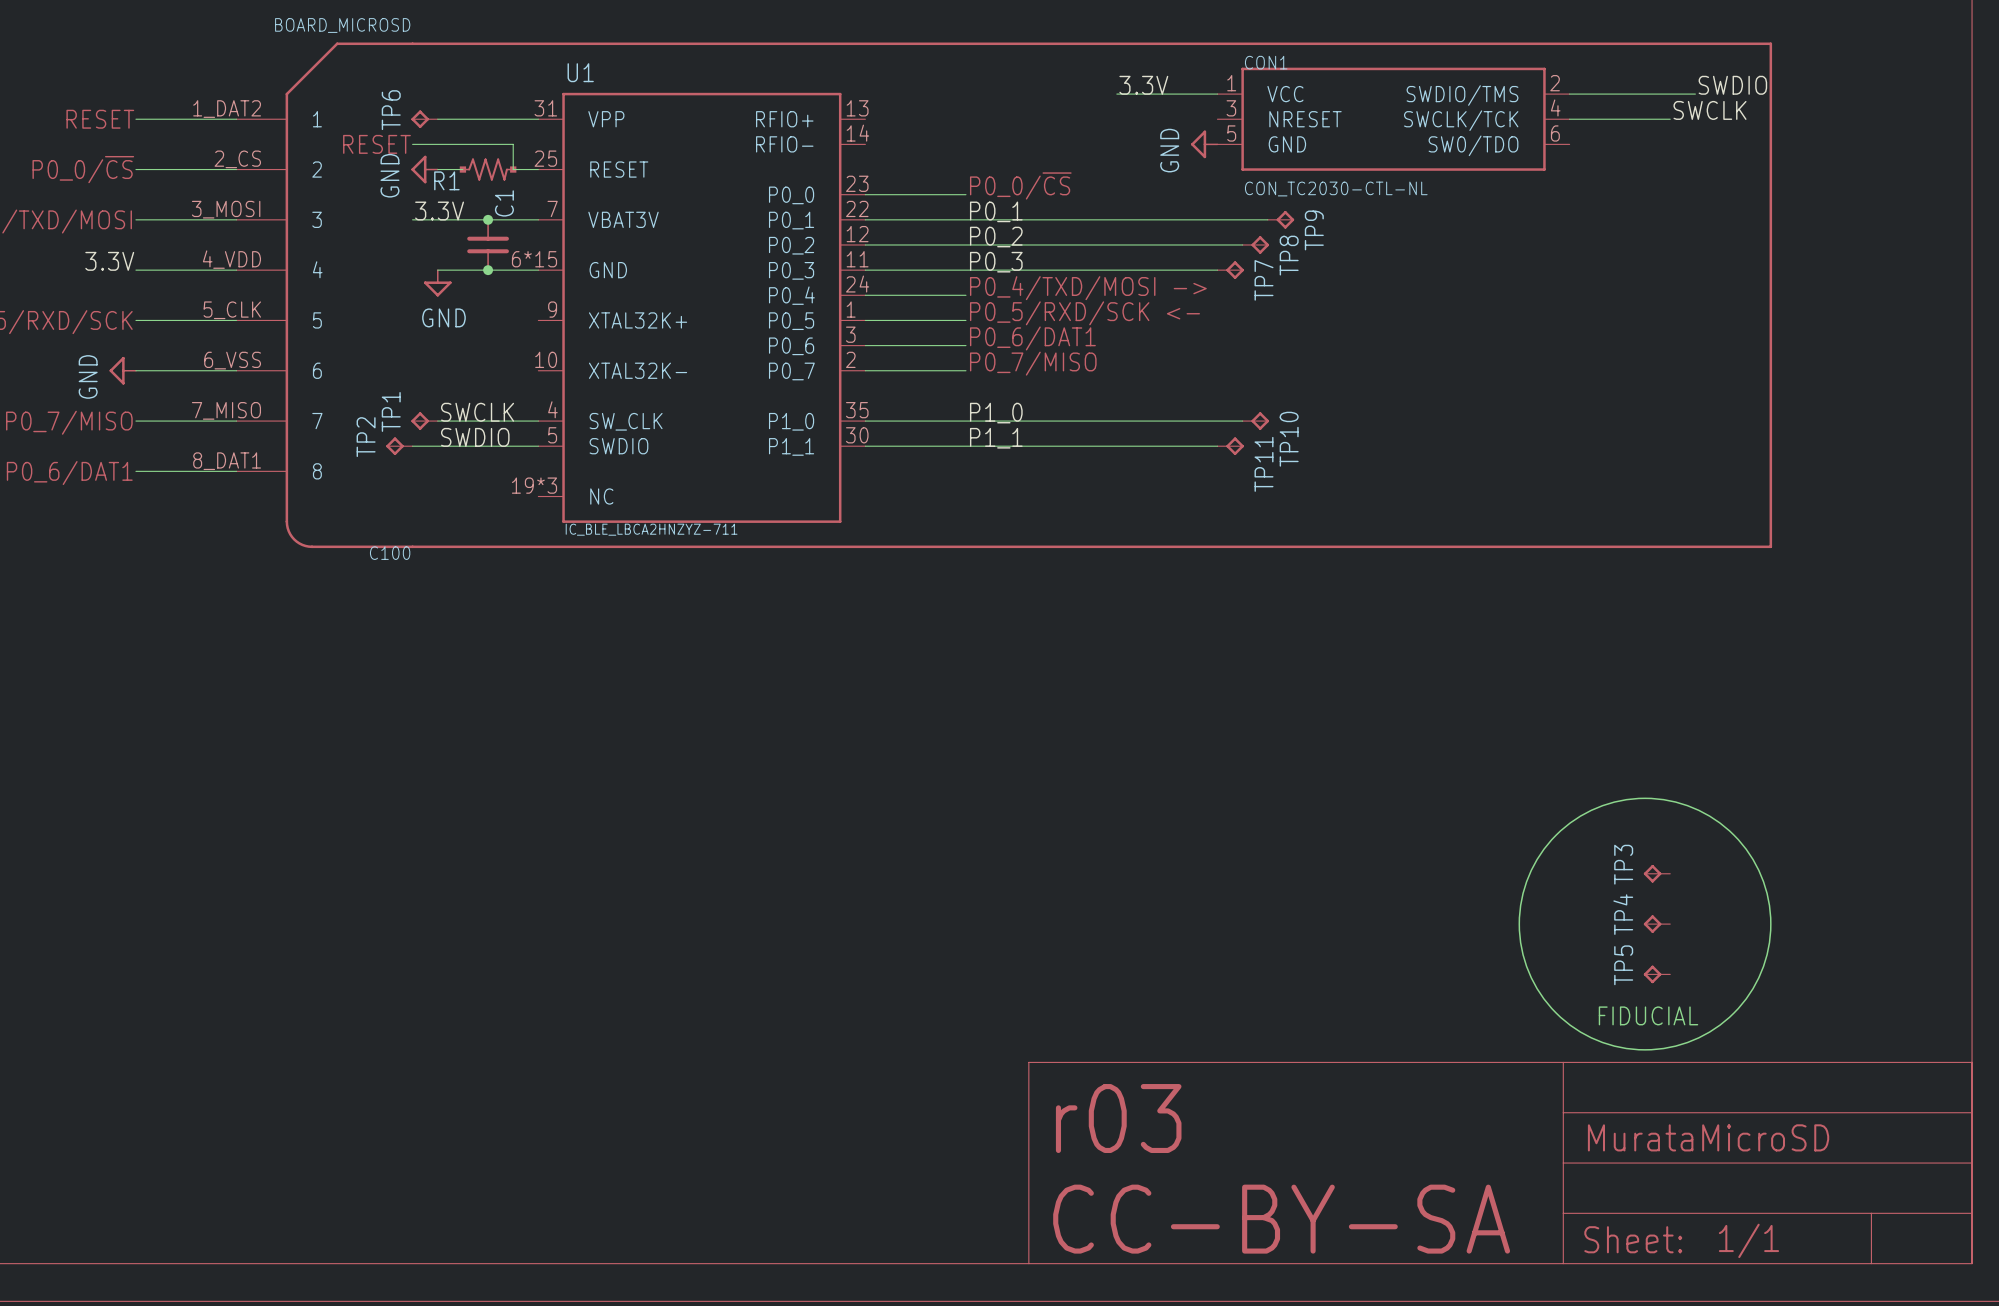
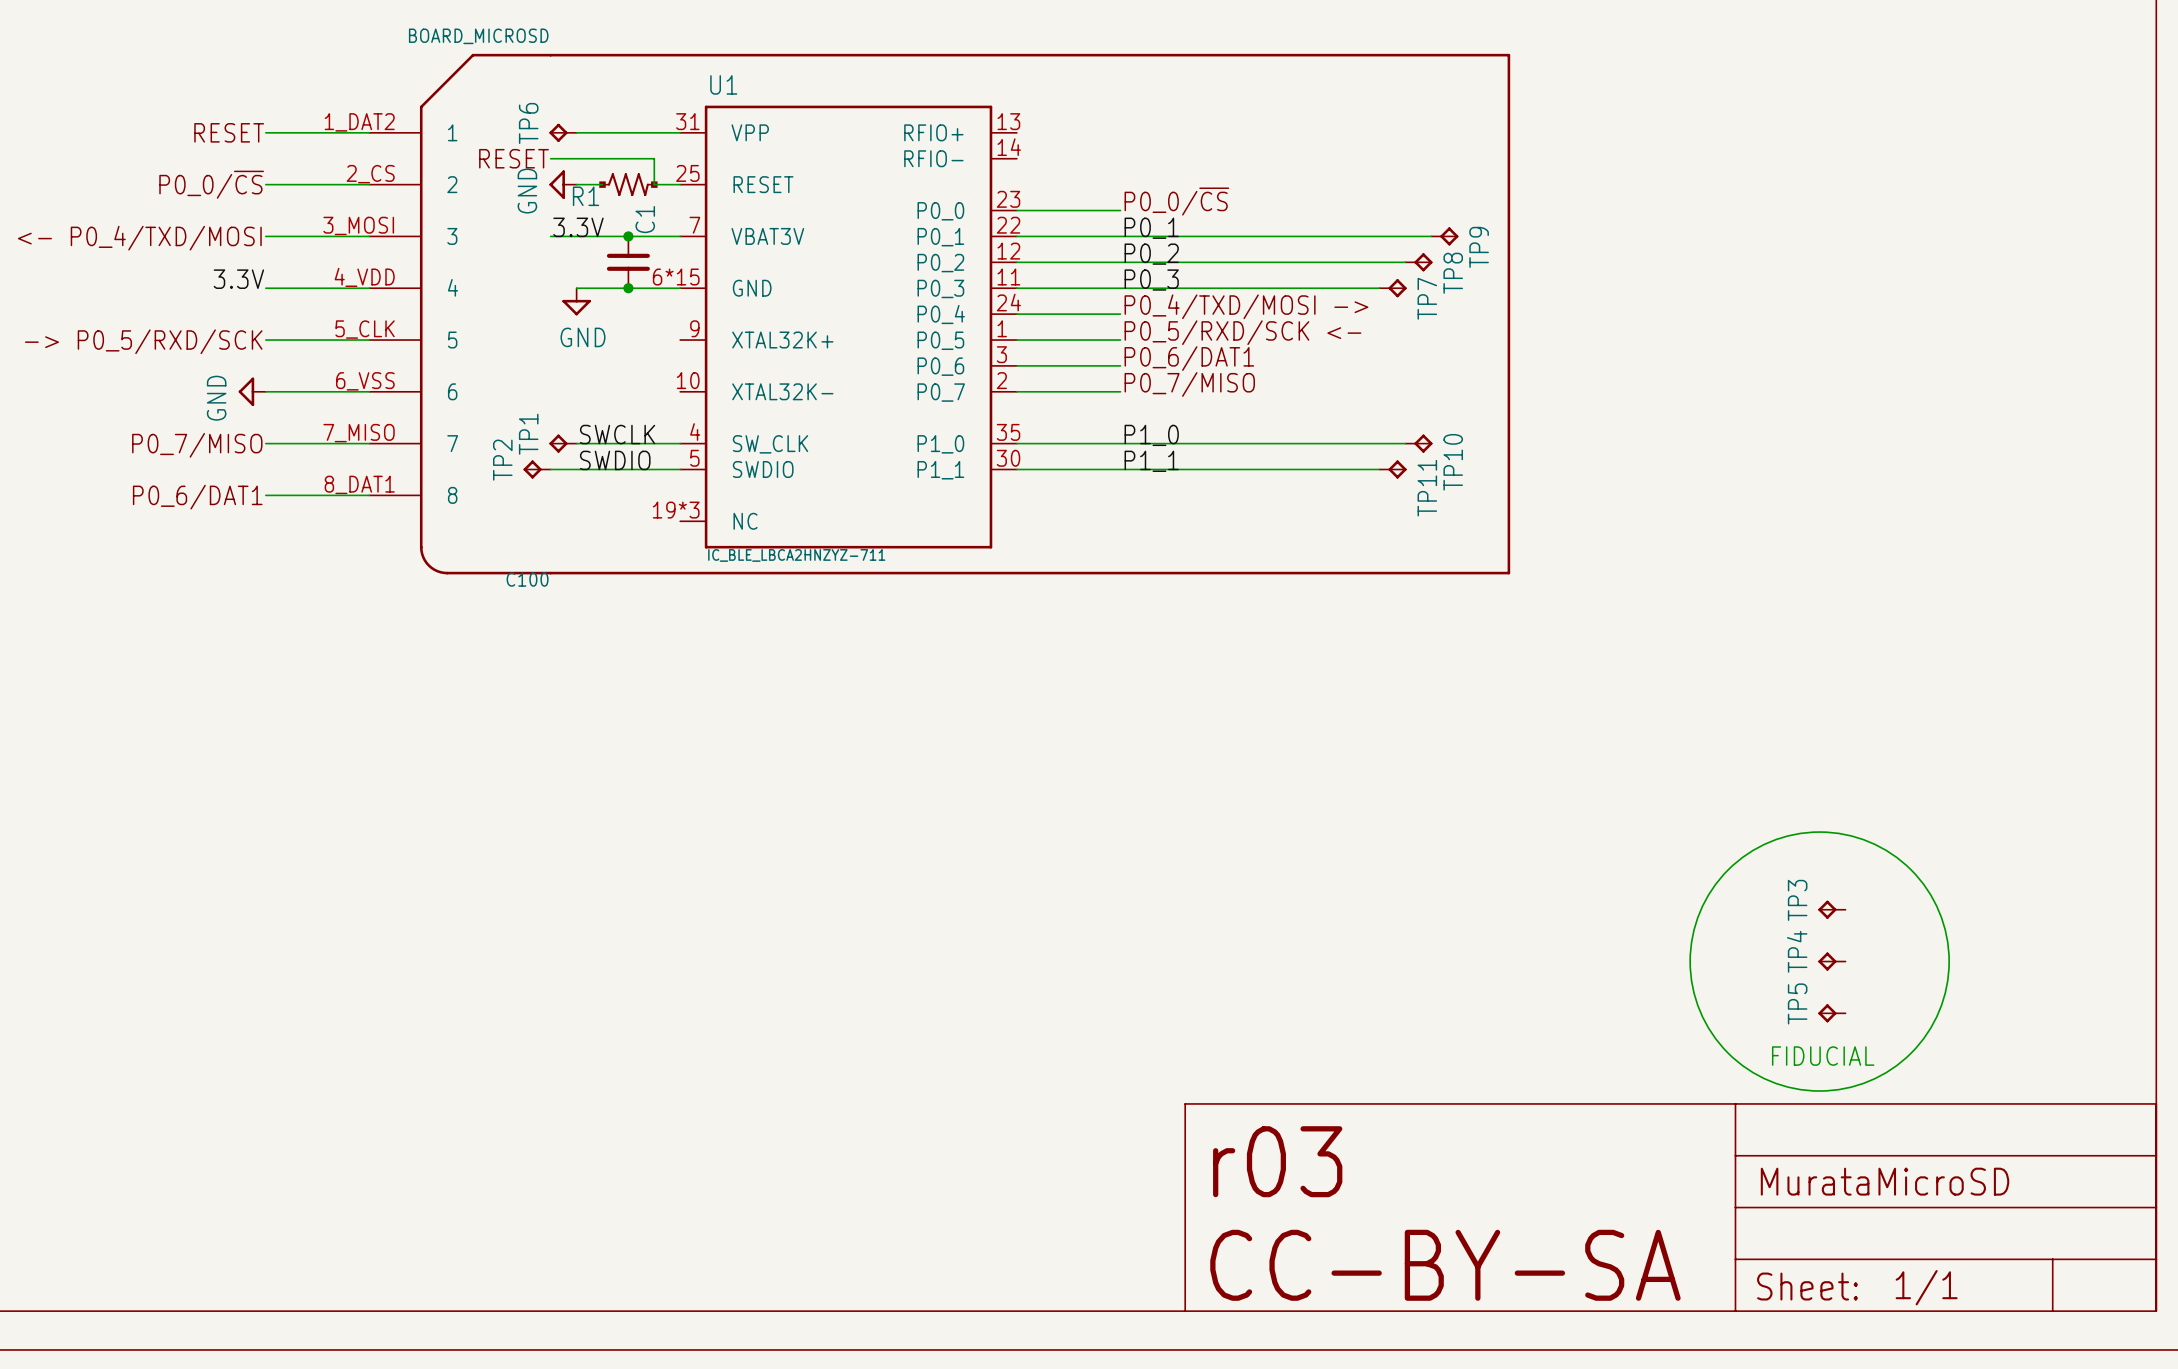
line: (1343, 43) (1770, 43) (1770, 546) (1343, 546) -> (1508, 55) (1508, 573)
label: 3.3V (1143, 85) -> none
label: SWDIO (1732, 85) -> none
wire: (1116, 94) (1217, 94) -> none
wire: (1569, 94) (1695, 94) -> none
label: SWCLK (1710, 110) -> none
CON1: CON_TC2030-CTL-NL (1393, 119) -> none
wire: (1569, 119) (1670, 119) -> none
power symbol: GND (1204, 144) -> none

